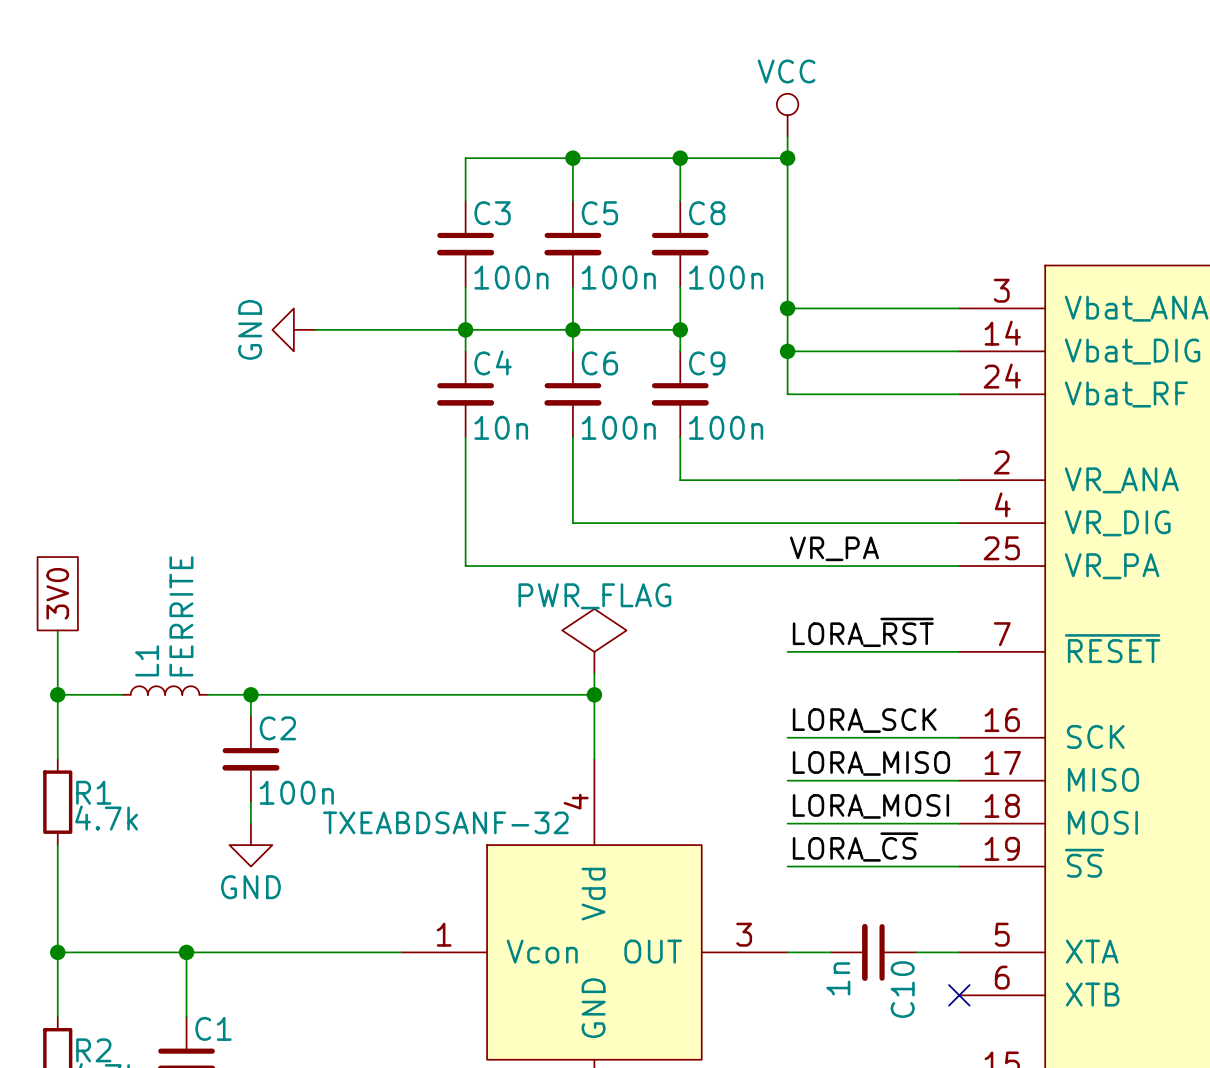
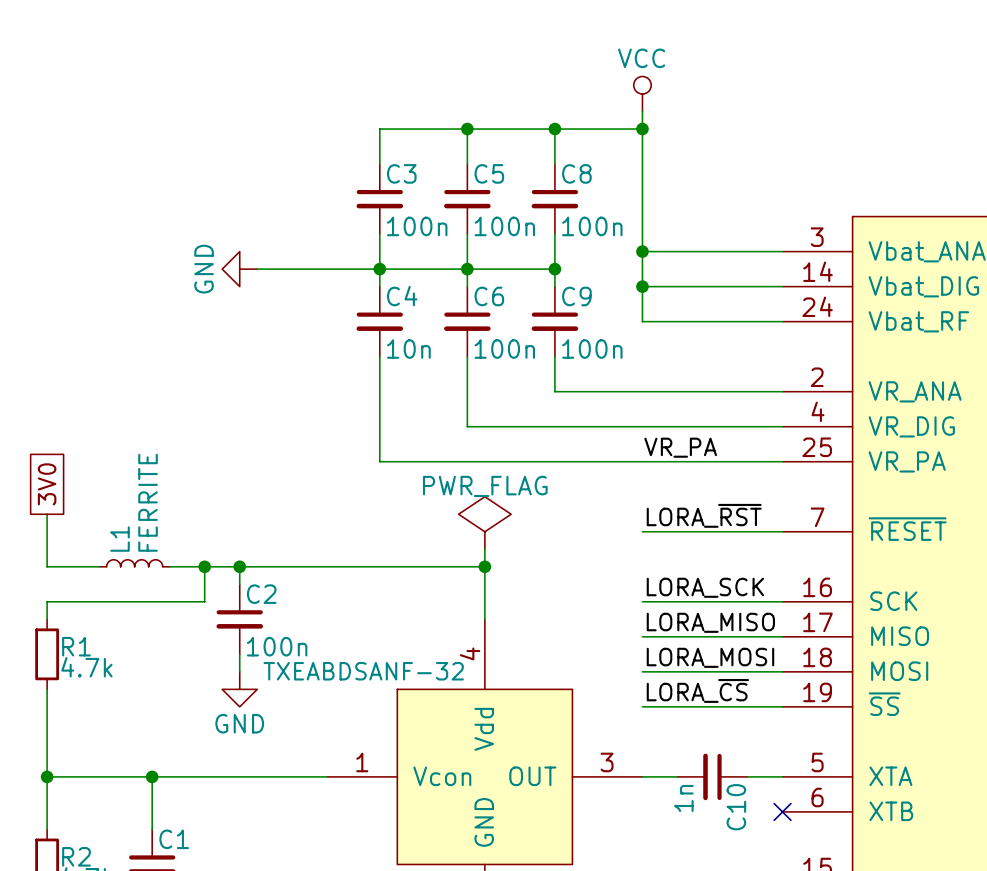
wire: (57, 694) (57, 737) -> (204, 584) (204, 601) (47, 601)
junction: (57, 694) -> none
wire: none -> (239, 566) (239, 584)
junction: none -> (239, 566)
C2 position: (250, 759) -> (239, 619)
wire: (250, 802) (250, 823) -> (239, 654) (239, 671)
power symbol position: GND (250, 845) -> GND (239, 689)

